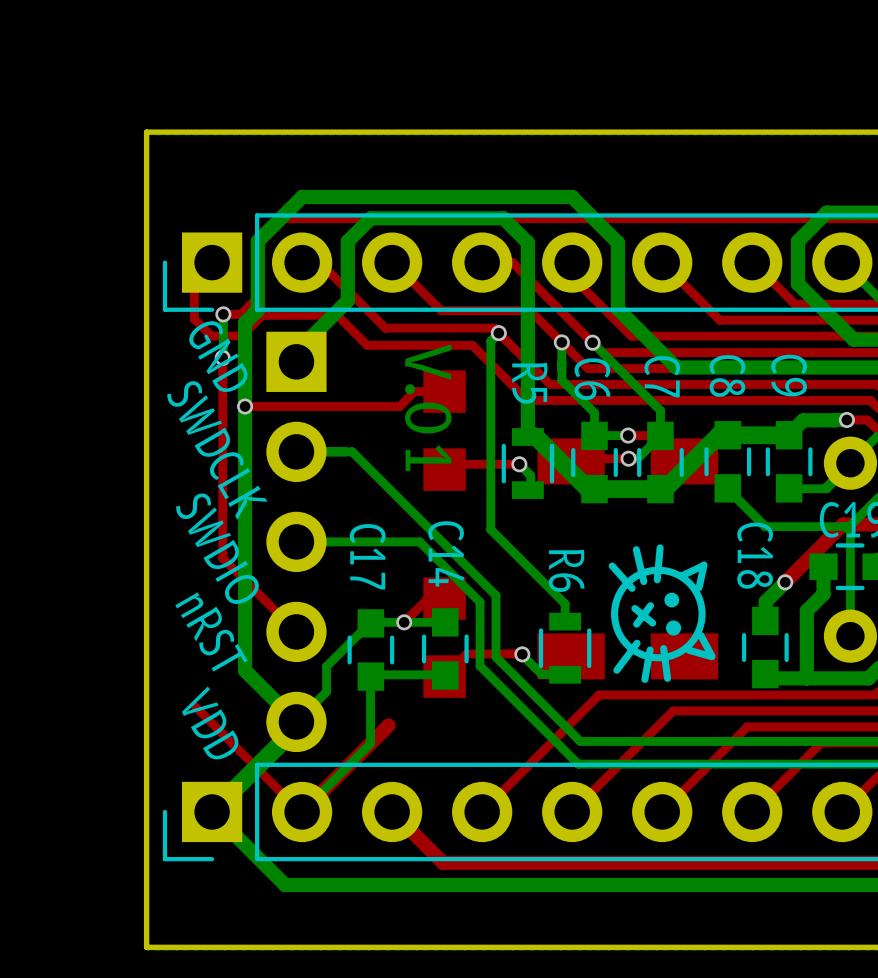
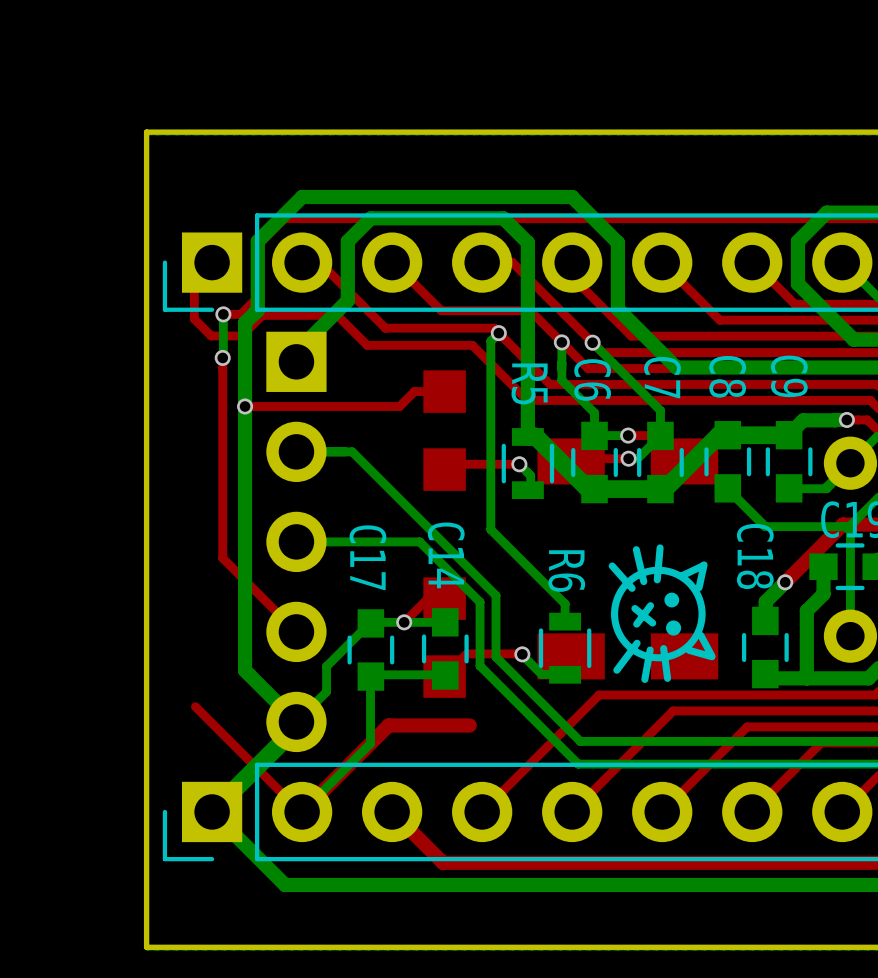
text: GND (218, 356) -> none
text: V.01 (428, 407) -> none
text: SWDCLK (217, 450) -> none
text: SWDIO (217, 548) -> none
text: nRST (211, 632) -> none
text: VDD (210, 723) -> none
top track: none -> (469, 725) (388, 725)

